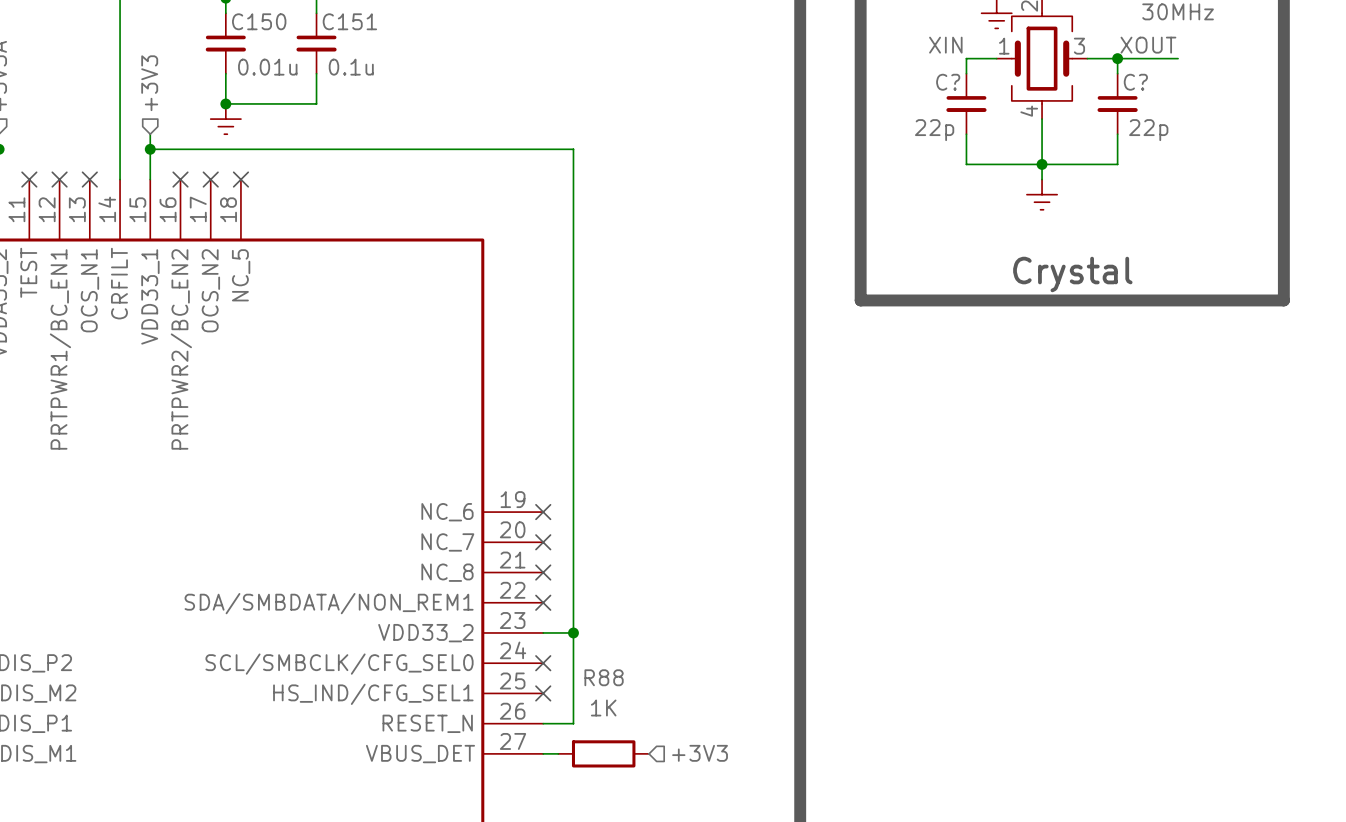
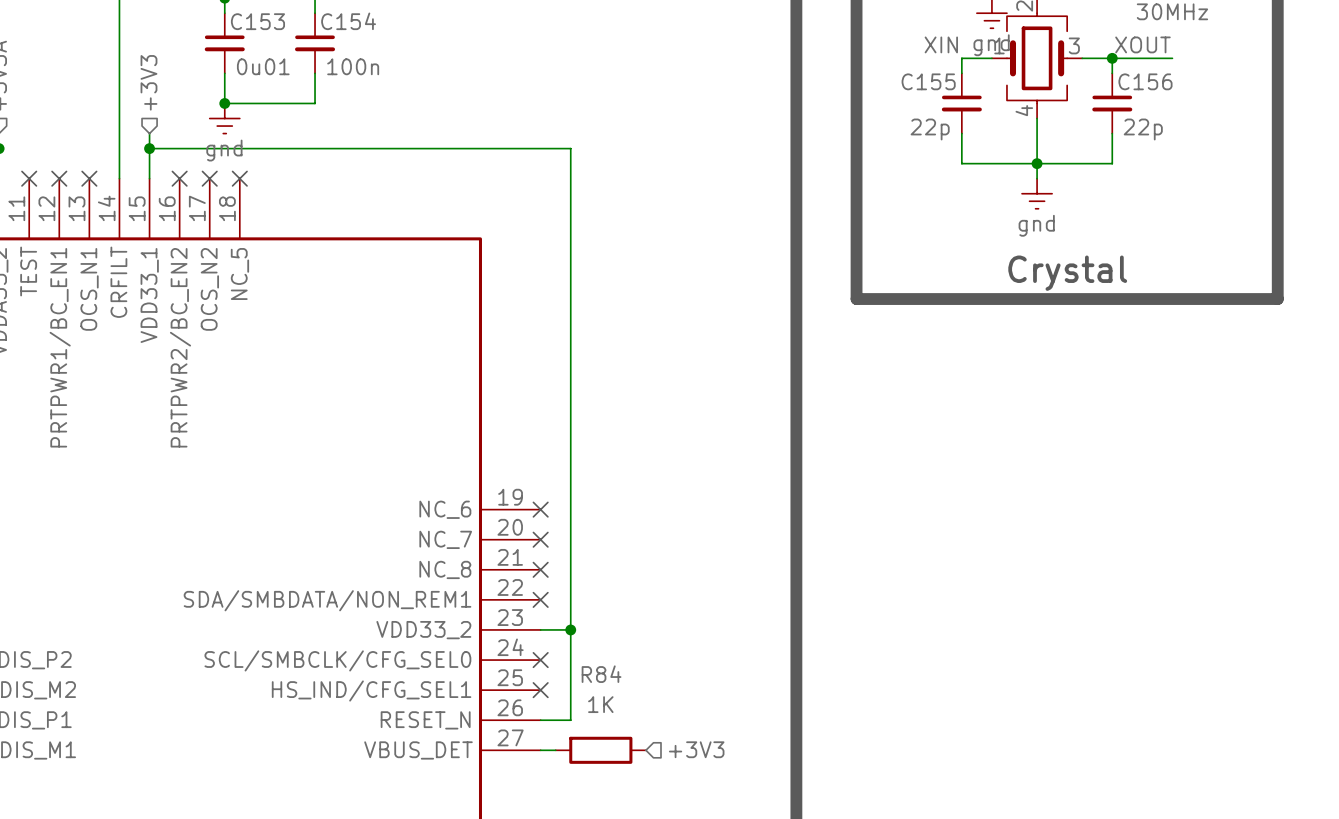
C150 name: C150 (259, 21) -> C153 (257, 21)
C151 name: C151 (349, 21) -> C154 (348, 21)
power symbol text: none -> gnd (991, 45)
C150 value: 0.01u (267, 67) -> 0u01 (263, 66)
C151 value: 0.1u (351, 67) -> 100n (353, 66)
C? name: C? (948, 82) -> C155 (928, 81)
C? name: C? (1135, 82) -> C156 (1145, 81)
power symbol text: none -> gnd (224, 150)
power symbol text: none -> gnd (1036, 225)
R88 name: R88 (604, 677) -> R84 (601, 674)

